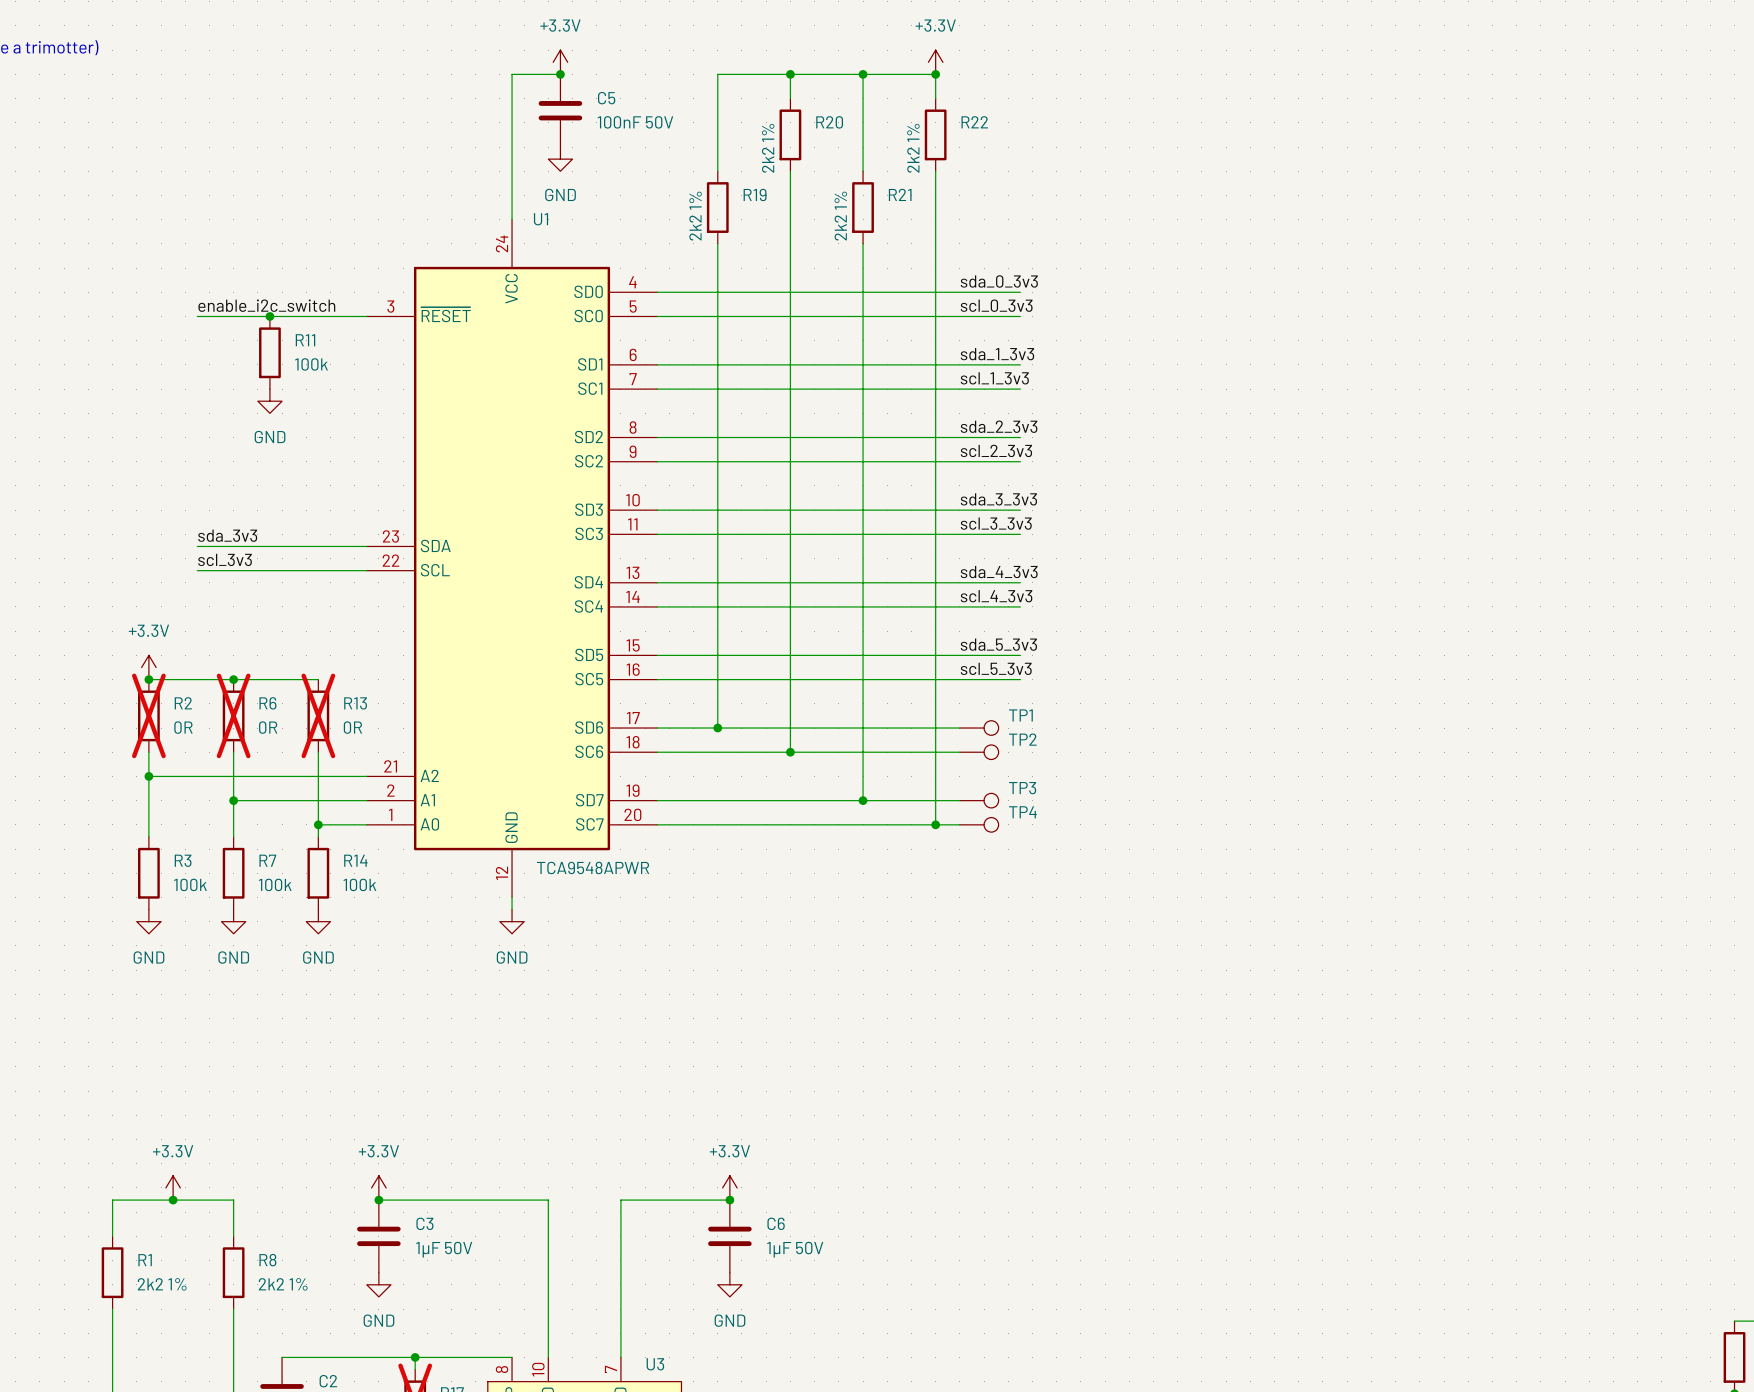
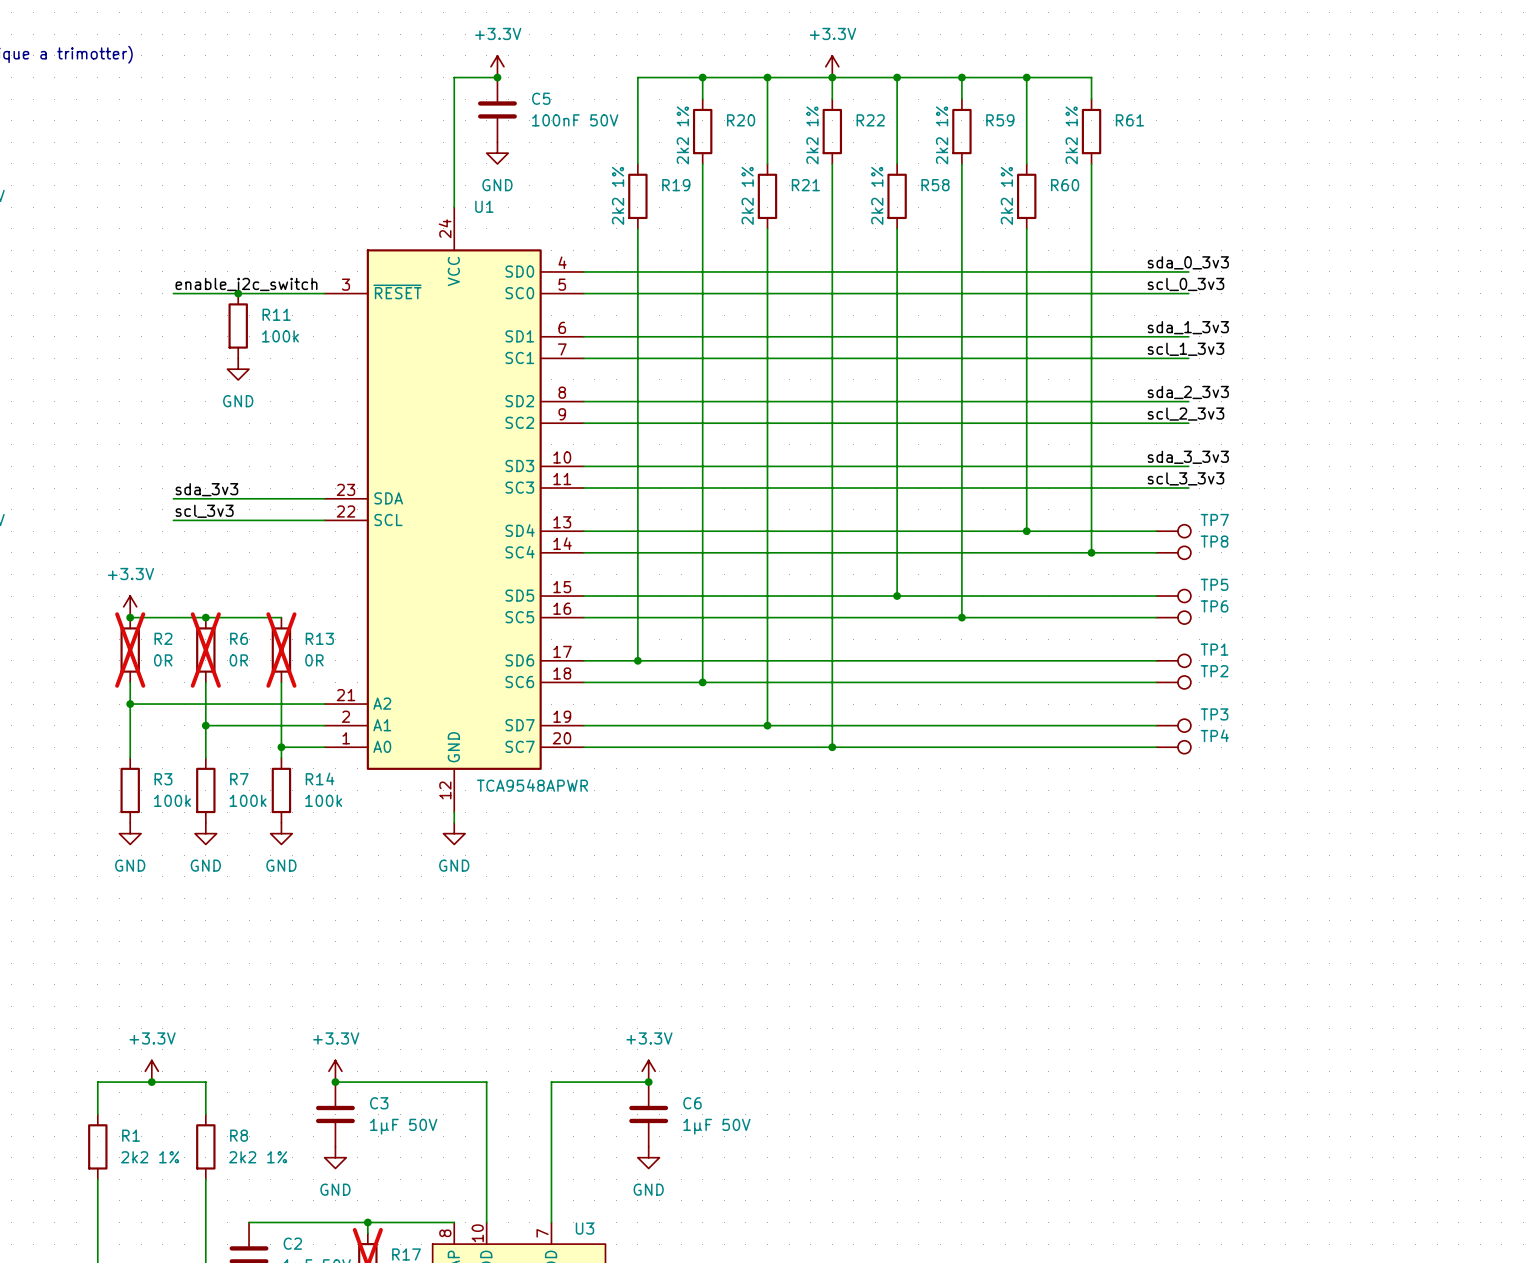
wire: none -> (832, 77) (1091, 77) (1091, 99)
wire: none -> (897, 77) (897, 163)
junction: none -> (897, 77)
wire: none -> (961, 77) (961, 99)
junction: none -> (961, 77)
wire: none -> (1026, 77) (1026, 163)
junction: none -> (1026, 77)
R59: none -> 2k2 1% (961, 131)
R61: none -> 2k2 1% (1091, 131)
wire: none -> (961, 163) (961, 617)
wire: none -> (1091, 163) (1091, 552)
R58: none -> 2k2 1% (897, 196)
R60: none -> 2k2 1% (1026, 196)
wire: none -> (897, 228) (897, 596)
wire: none -> (1026, 228) (1026, 531)
label: sda_0_3v3 (999, 281) -> none
label: none -> sda_0_3v3 (1188, 262)
wire: none -> (907, 271) (1188, 271)
label: scl_0_3v3 (996, 305) -> none
label: none -> scl_0_3v3 (1186, 284)
wire: none -> (907, 293) (1188, 293)
label: sda_1_3v3 (997, 354) -> none
label: none -> sda_1_3v3 (1188, 327)
wire: none -> (907, 336) (1188, 336)
label: scl_1_3v3 (994, 378) -> none
label: none -> scl_1_3v3 (1186, 349)
wire: none -> (907, 358) (1188, 358)
label: sda_2_3v3 (999, 426) -> none
label: none -> sda_2_3v3 (1188, 392)
wire: none -> (907, 401) (1188, 401)
label: scl_2_3v3 (996, 450) -> none
label: none -> scl_2_3v3 (1186, 414)
wire: none -> (907, 423) (1188, 423)
label: sda_3_3v3 (998, 499) -> none
label: none -> sda_3_3v3 (1188, 457)
wire: none -> (907, 466) (1188, 466)
label: scl_3_3v3 (996, 523) -> none
label: none -> scl_3_3v3 (1186, 478)
wire: none -> (907, 488) (1188, 488)
label: sda_4_3v3 (999, 572) -> none
wire: none -> (907, 531) (1156, 531)
junction: none -> (1026, 531)
TP7: none -> (1173, 531)
label: scl_4_3v3 (996, 596) -> none
wire: none -> (907, 552) (1156, 552)
junction: none -> (1091, 552)
TP8: none -> (1173, 552)
label: sda_5_3v3 (998, 644) -> none
junction: none -> (897, 596)
wire: none -> (907, 596) (1156, 596)
TP5: none -> (1173, 596)
label: scl_5_3v3 (996, 668) -> none
wire: none -> (907, 617) (1156, 617)
junction: none -> (961, 617)
TP6: none -> (1173, 617)
wire: none -> (853, 660) (1156, 660)
TP1 position: (979, 728) -> (1173, 660)
wire: none -> (853, 682) (1156, 682)
TP2 position: (979, 752) -> (1173, 682)
wire: none -> (853, 725) (1156, 725)
TP3 position: (979, 800) -> (1173, 725)
wire: none -> (853, 747) (1156, 747)
TP4 position: (979, 824) -> (1173, 747)

